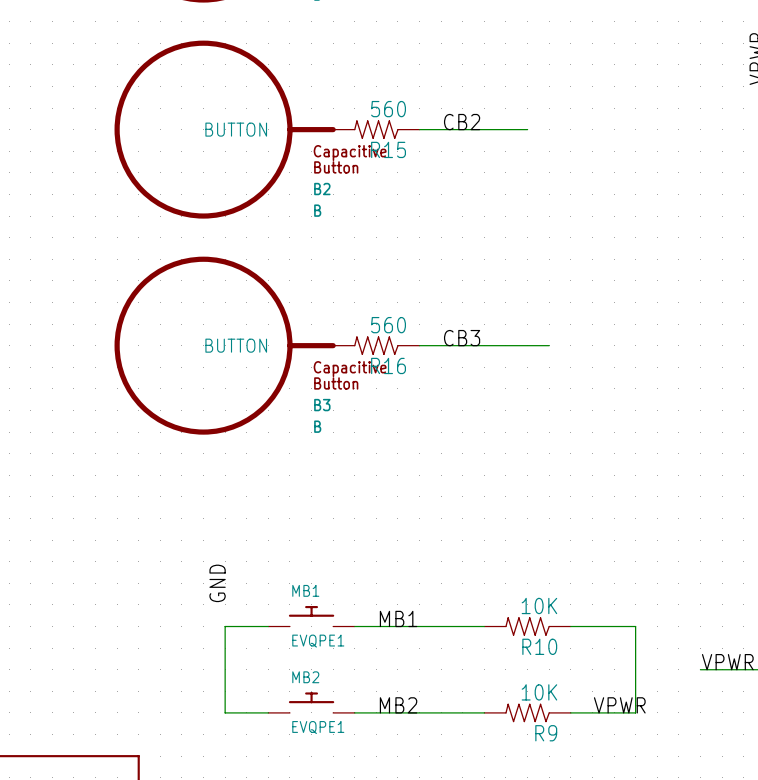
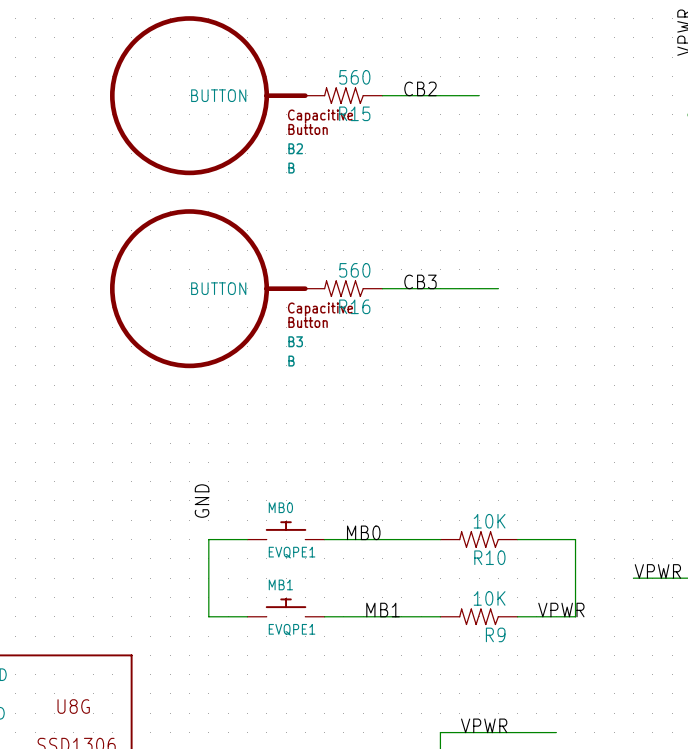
MB1 name: MB1 (305, 590) -> MB0 (280, 507)
label: MB1 (398, 618) -> MB0 (363, 532)
MB2 name: MB2 (305, 677) -> MB1 (280, 584)
label: MB2 (398, 705) -> MB1 (383, 610)

